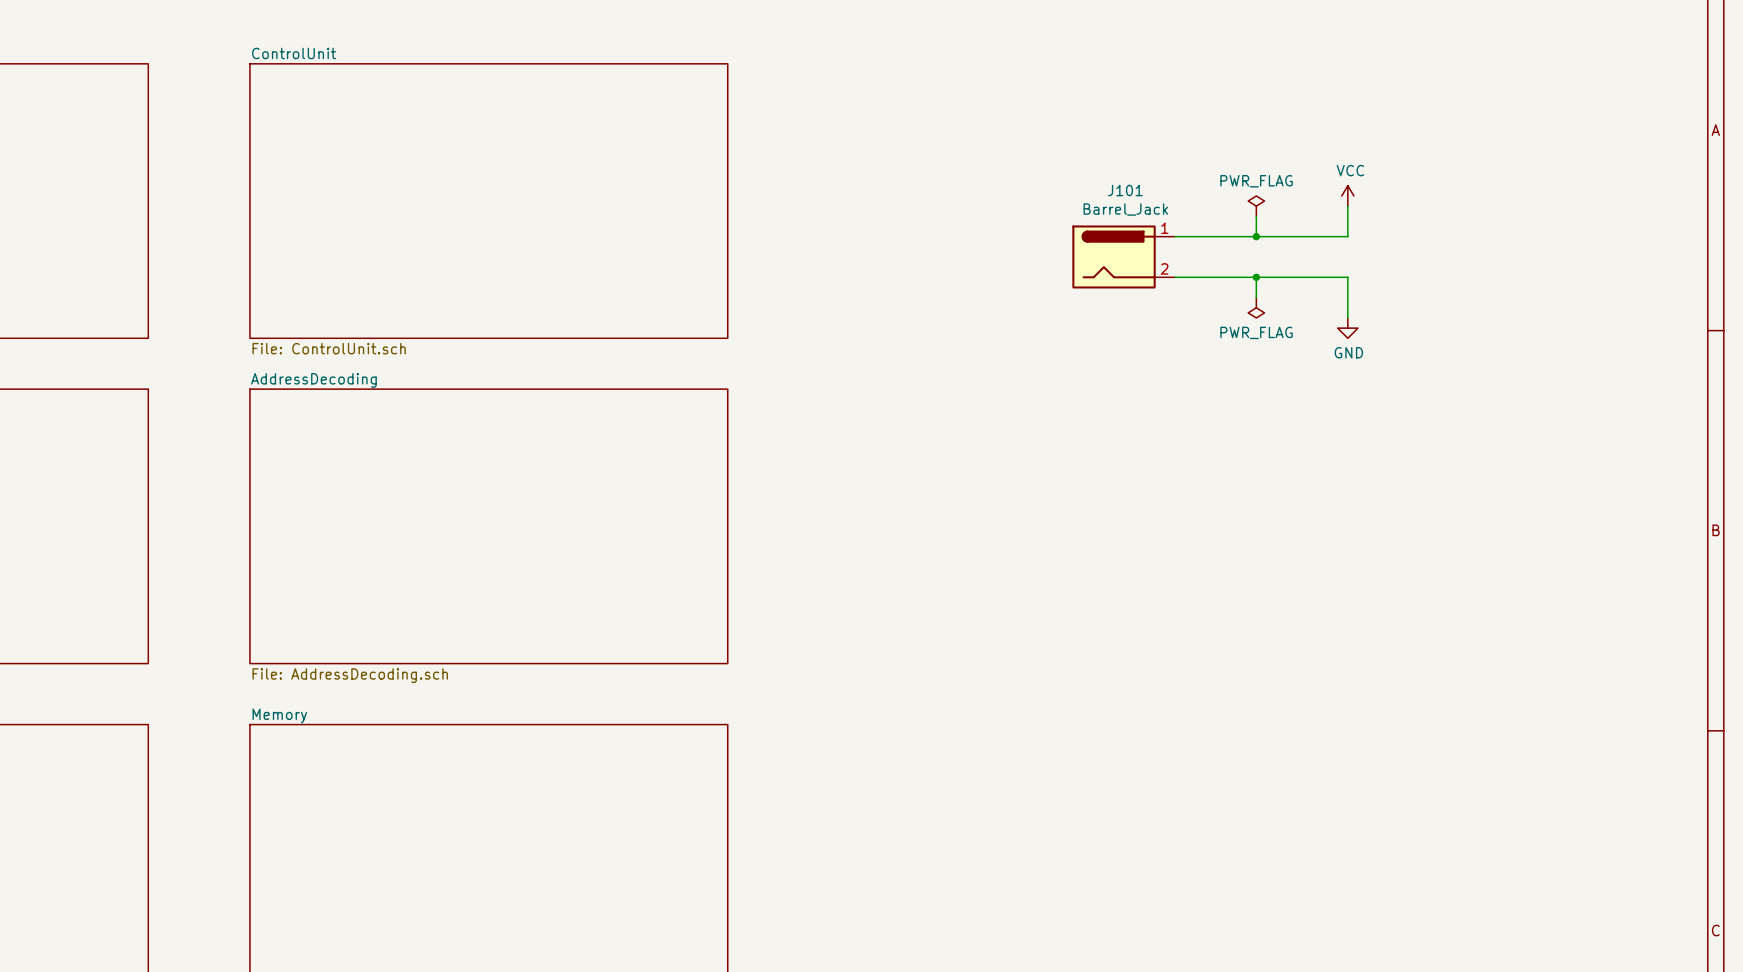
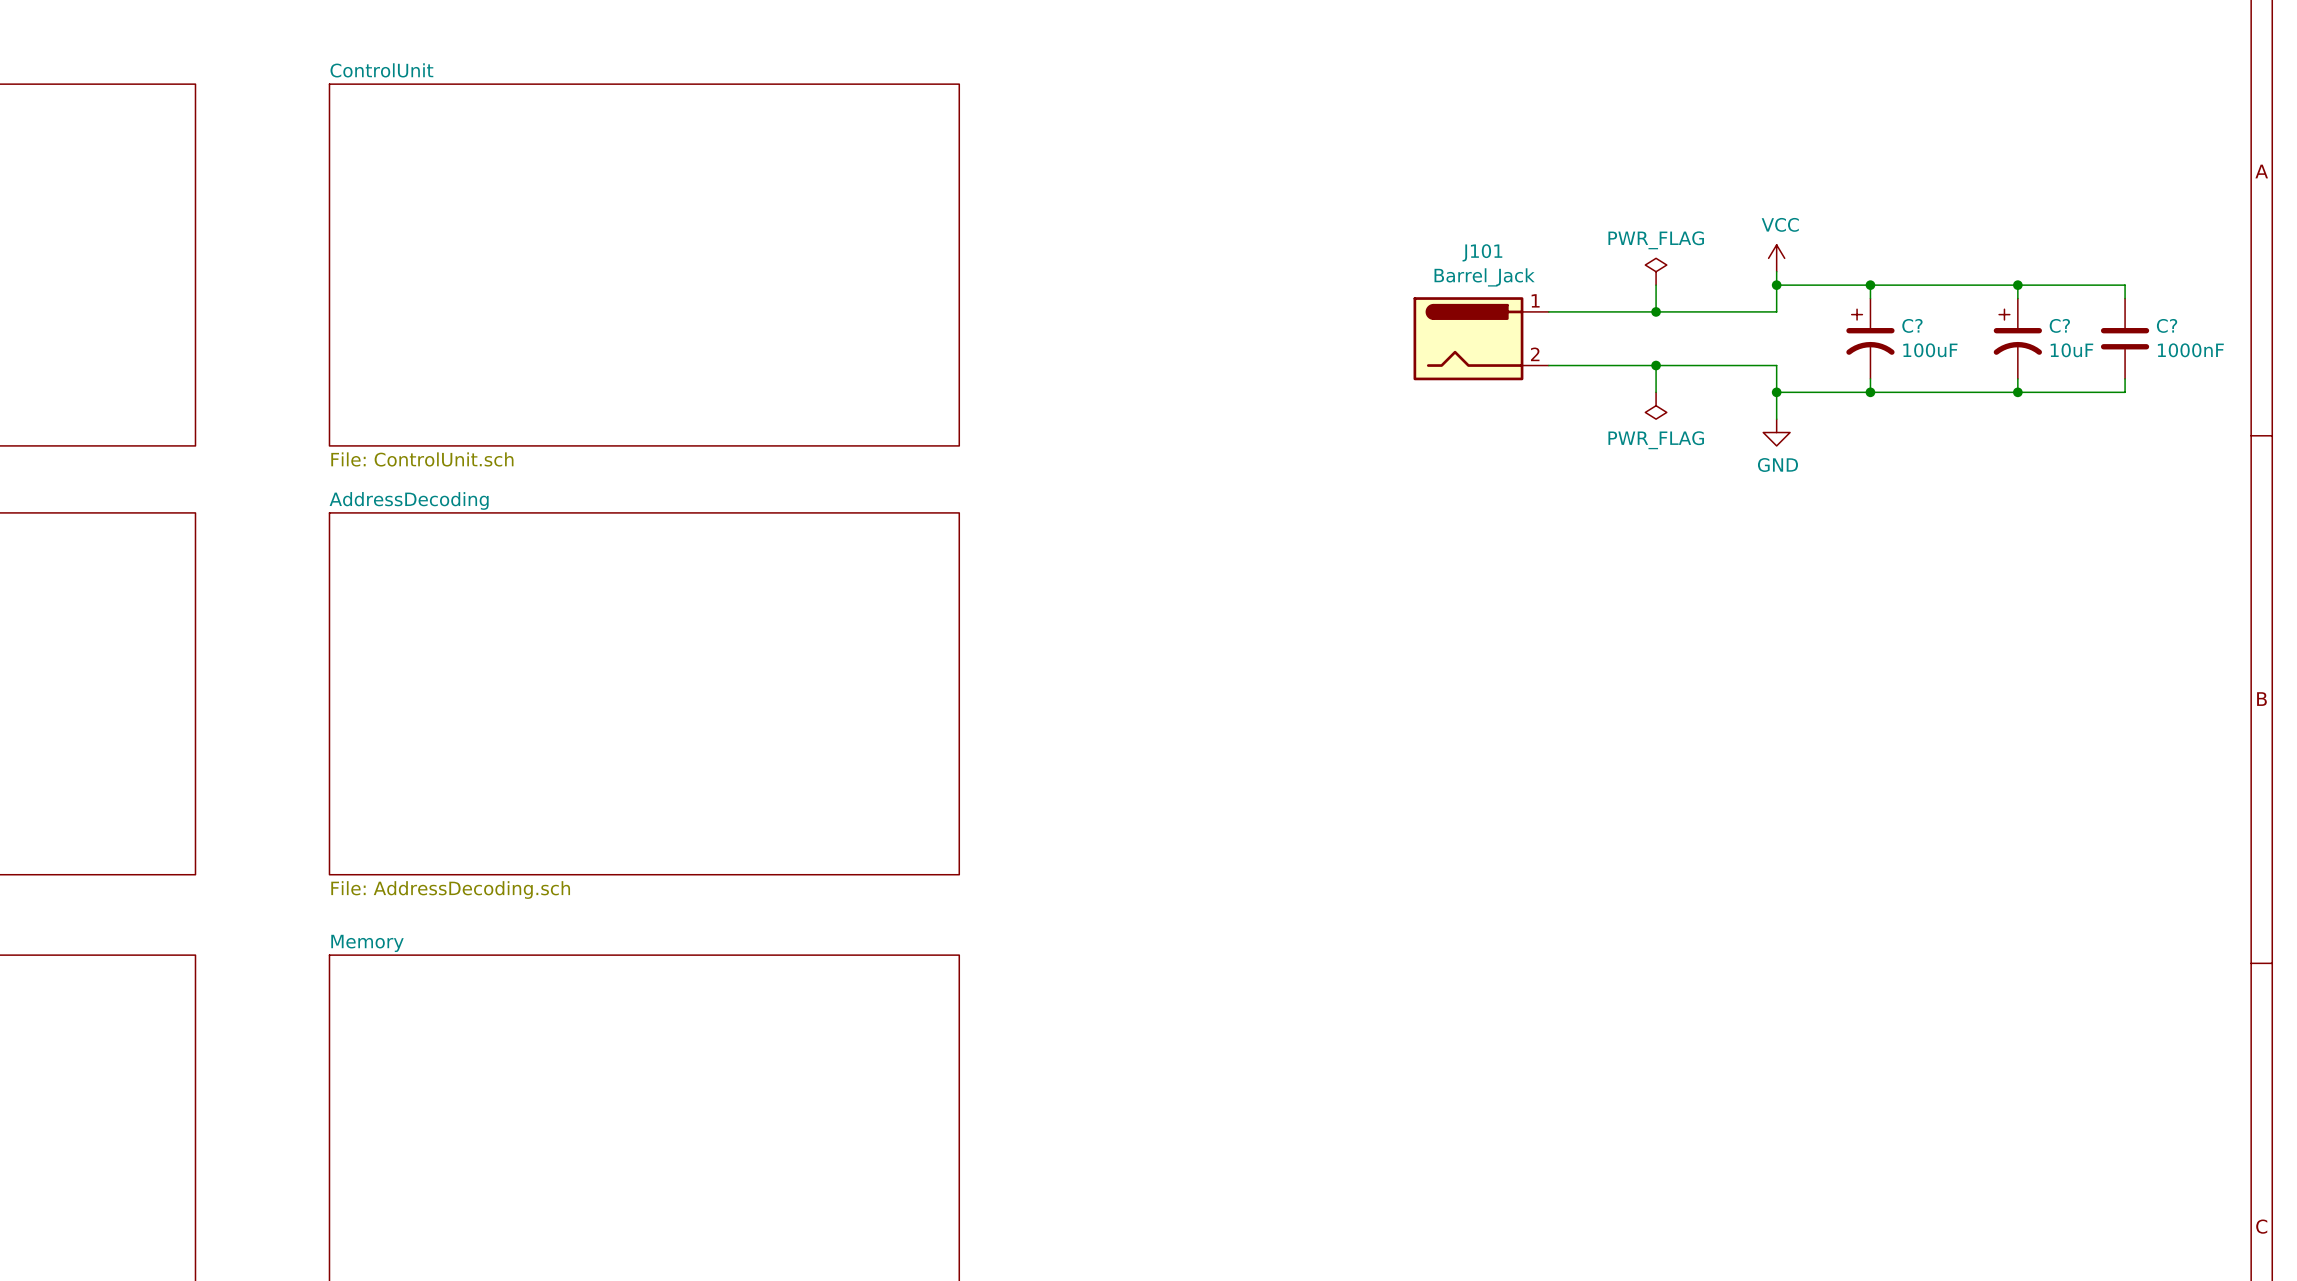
wire: none -> (1776, 285) (2125, 285) (2125, 298)
junction: none -> (1776, 285)
wire: none -> (1870, 285) (1870, 298)
junction: none -> (1870, 285)
wire: none -> (2017, 285) (2017, 298)
junction: none -> (2017, 285)
C?: none -> 100uF (1870, 338)
C?: none -> 10uF (2017, 338)
C?: none -> 1000nF (2125, 338)
wire: none -> (1870, 378) (1870, 392)
wire: none -> (2017, 378) (2017, 392)
wire: none -> (2125, 378) (2125, 392) (1776, 392)
junction: none -> (1776, 392)
junction: none -> (1870, 392)
junction: none -> (2017, 392)

